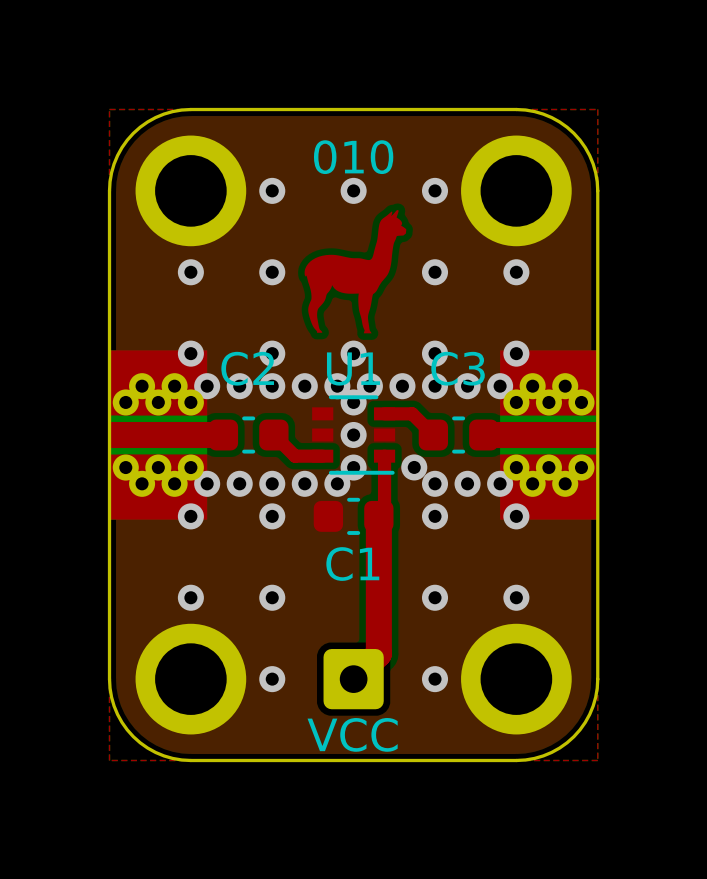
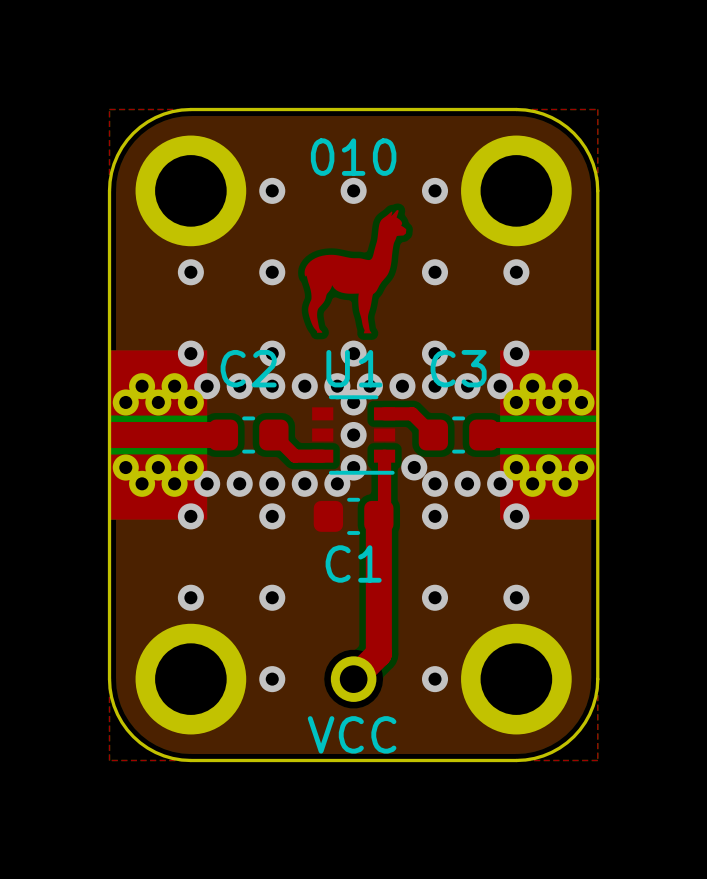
part footprint: [323, 649, 384, 710] -> [330, 656, 377, 702]

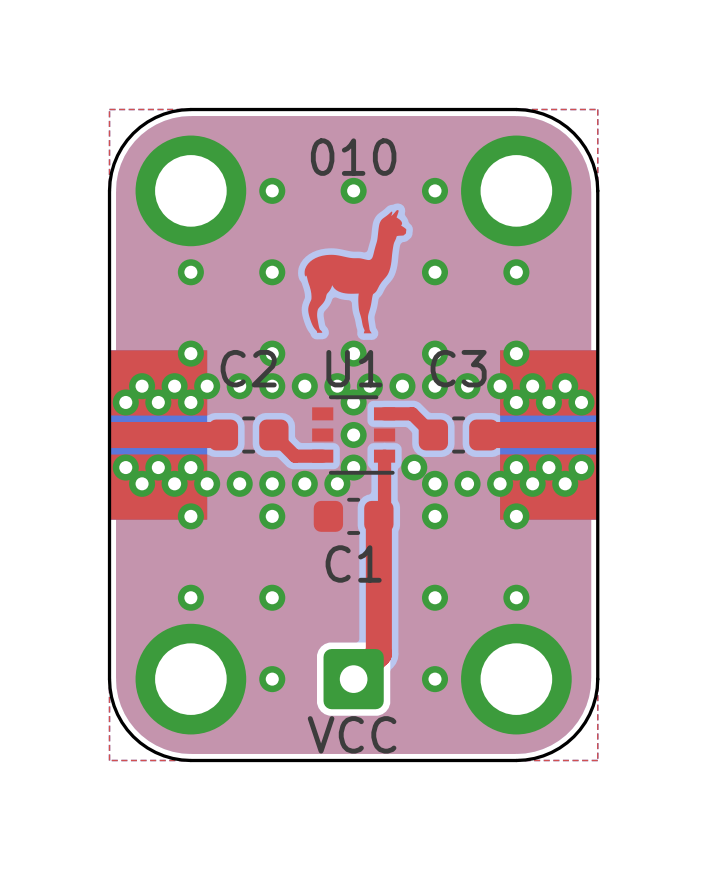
part footprint: [330, 656, 377, 702] -> [323, 649, 384, 710]

